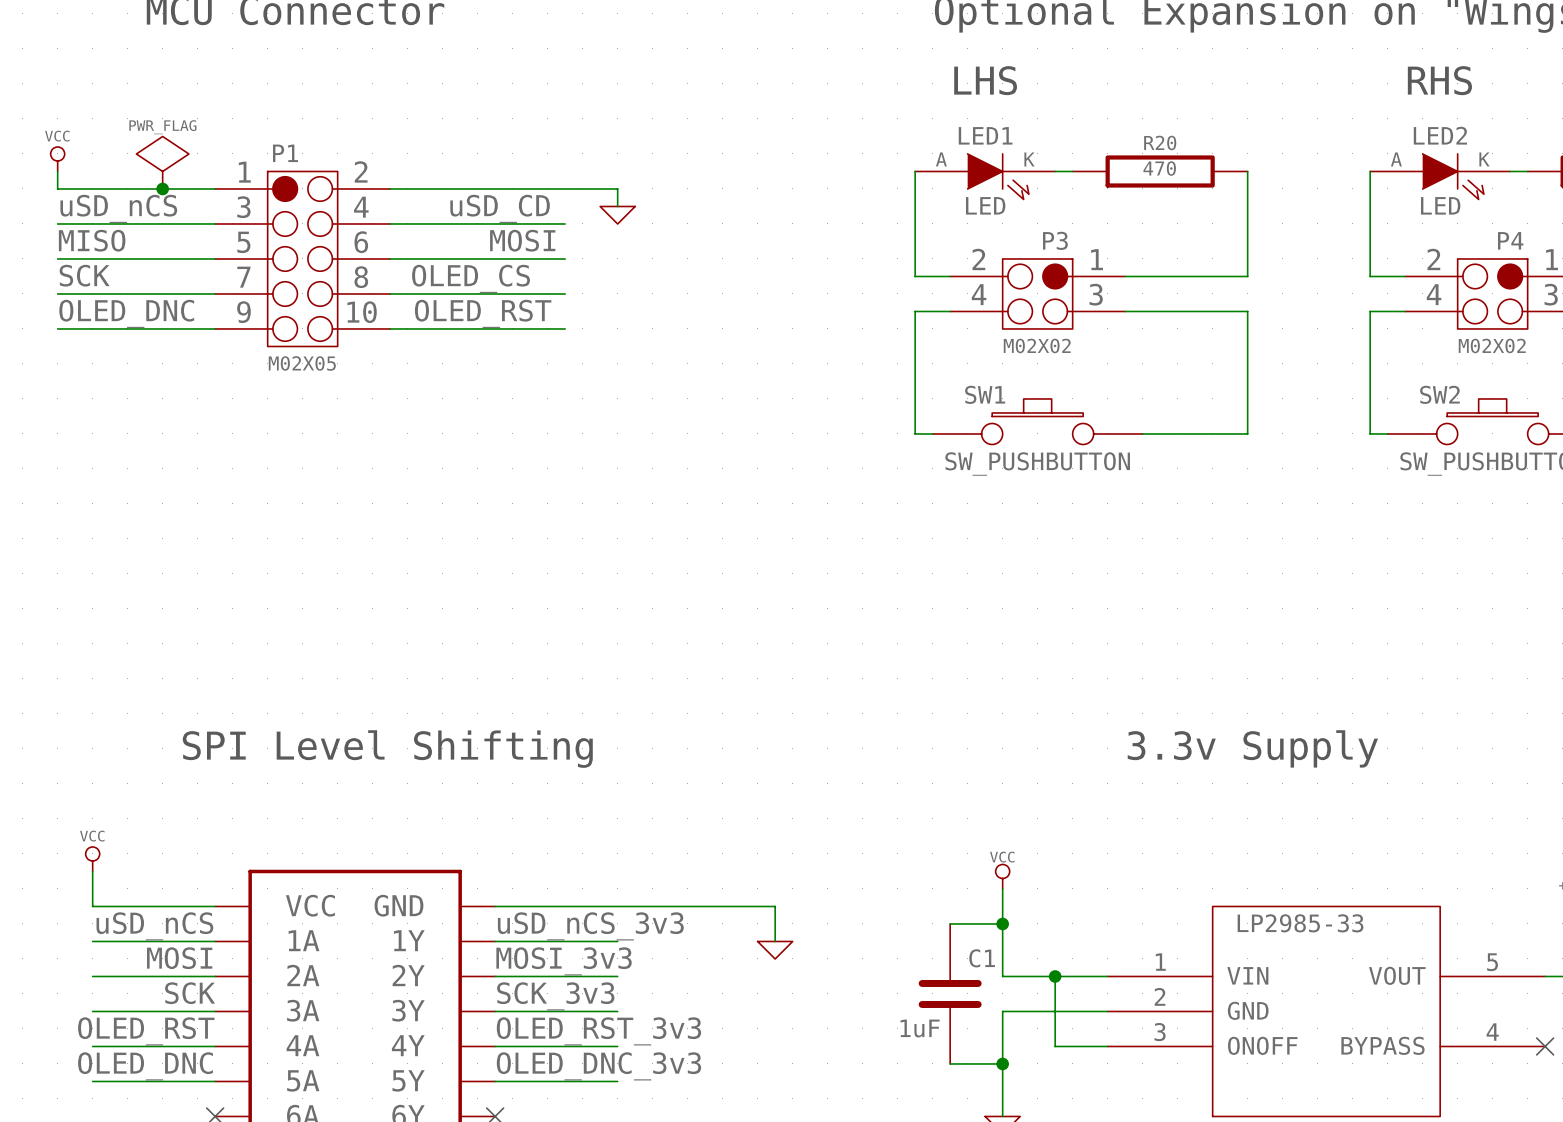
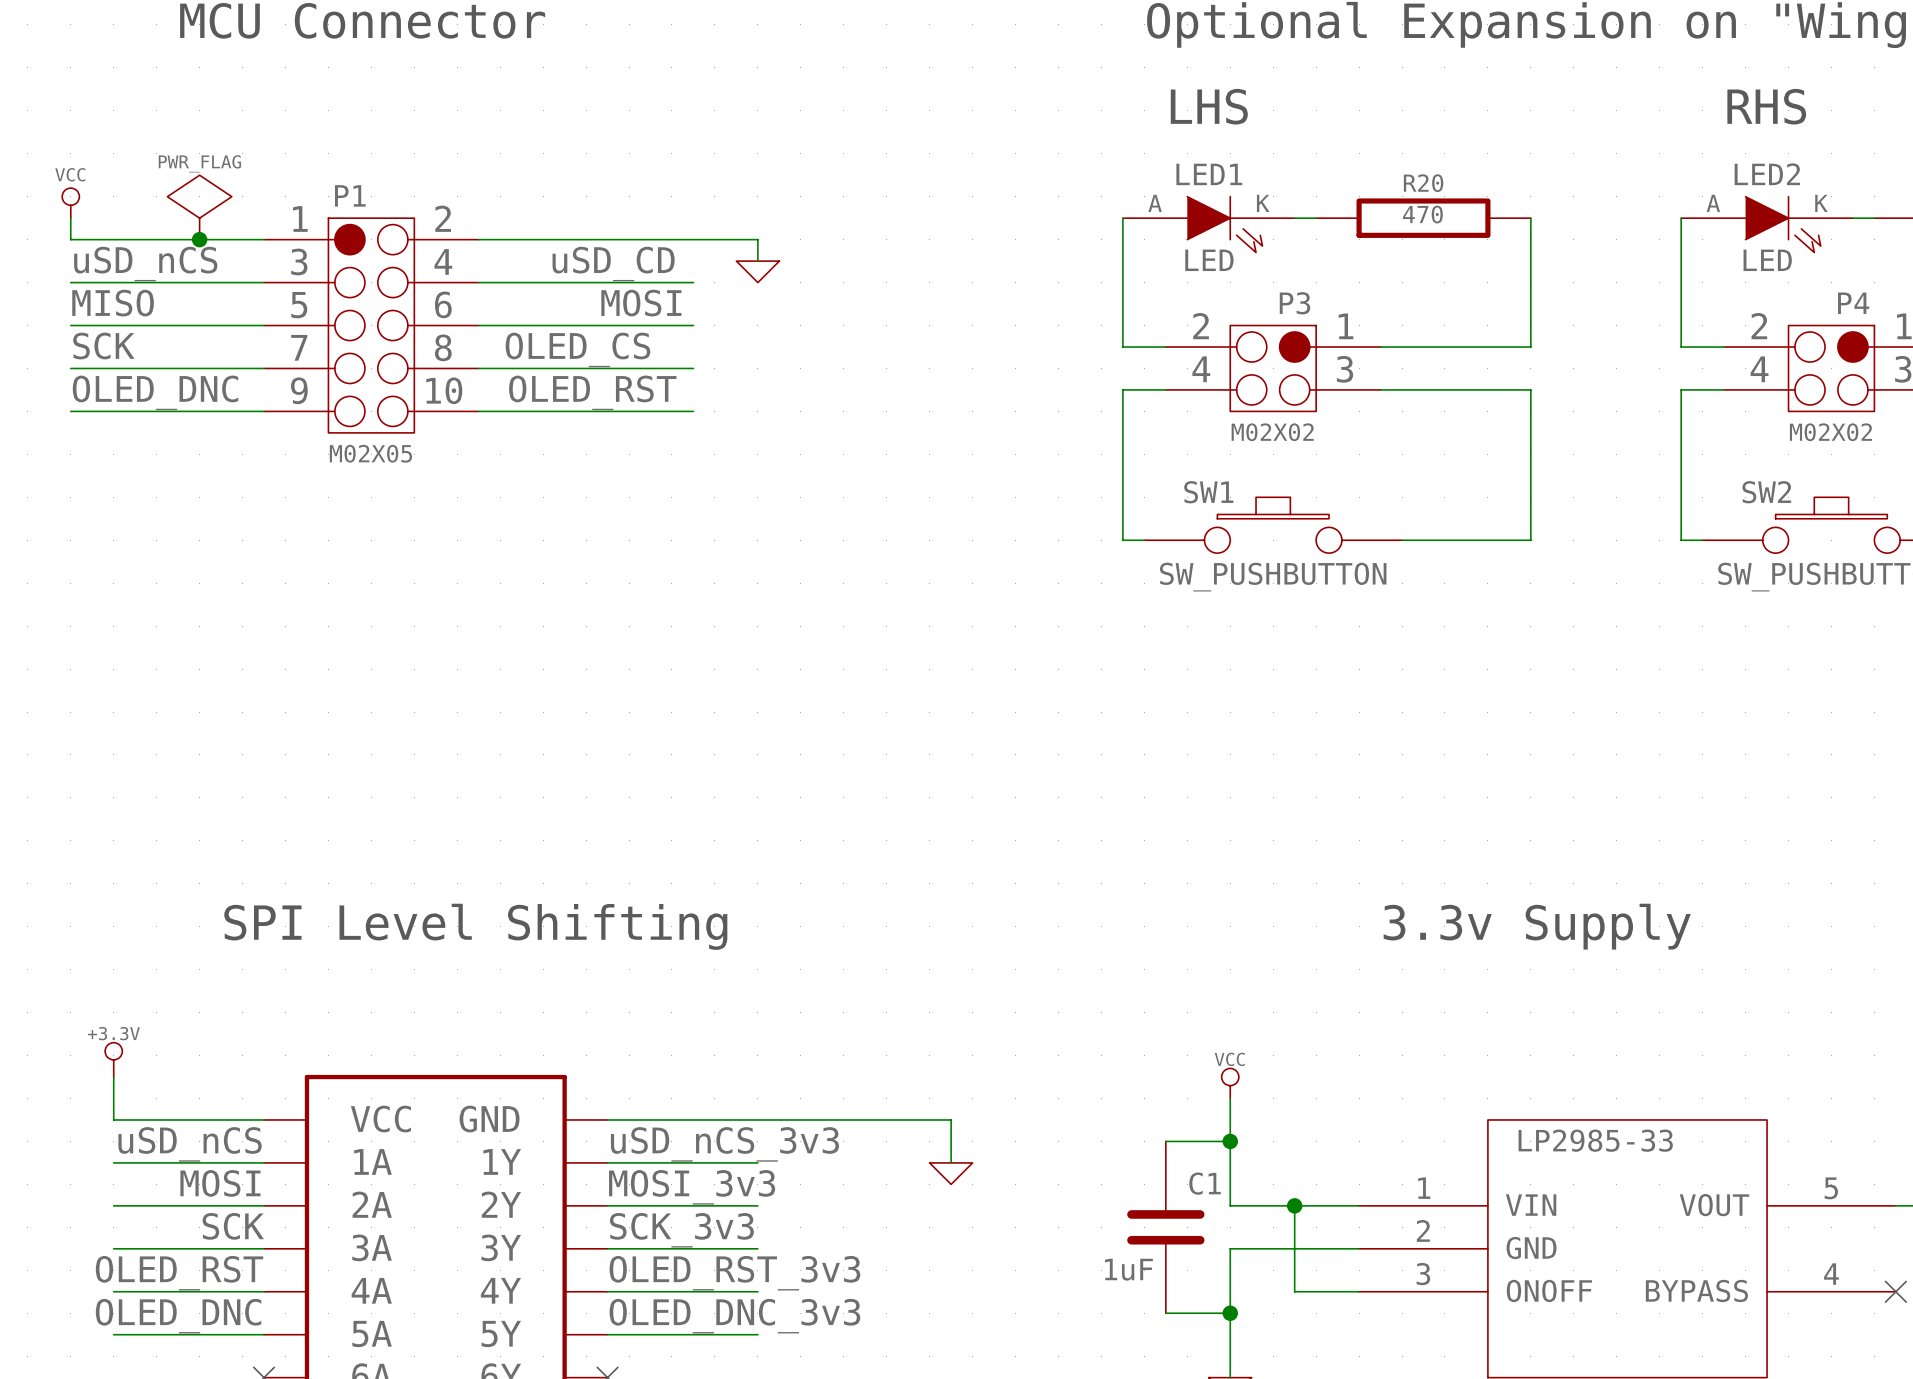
power symbol: VCC (92, 859) -> +3.3V (113, 1059)

